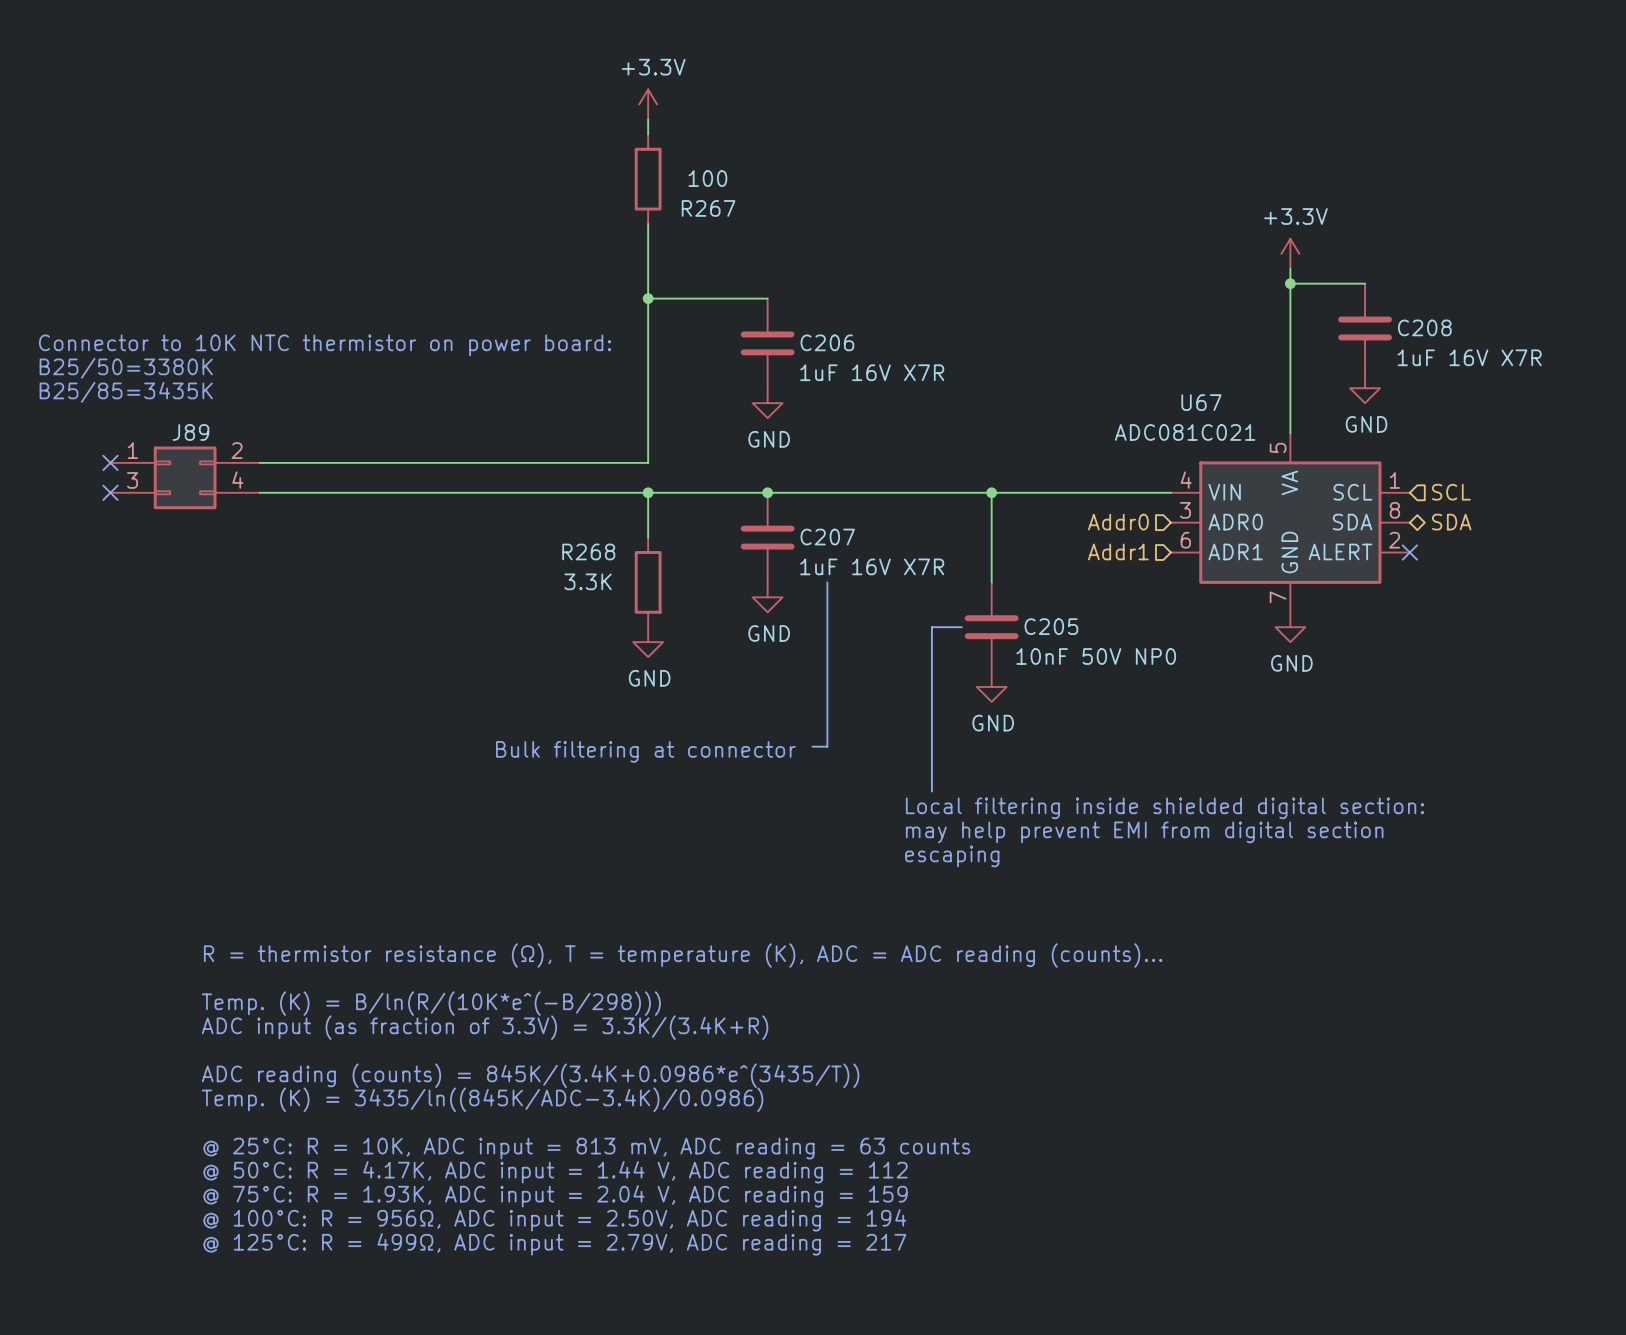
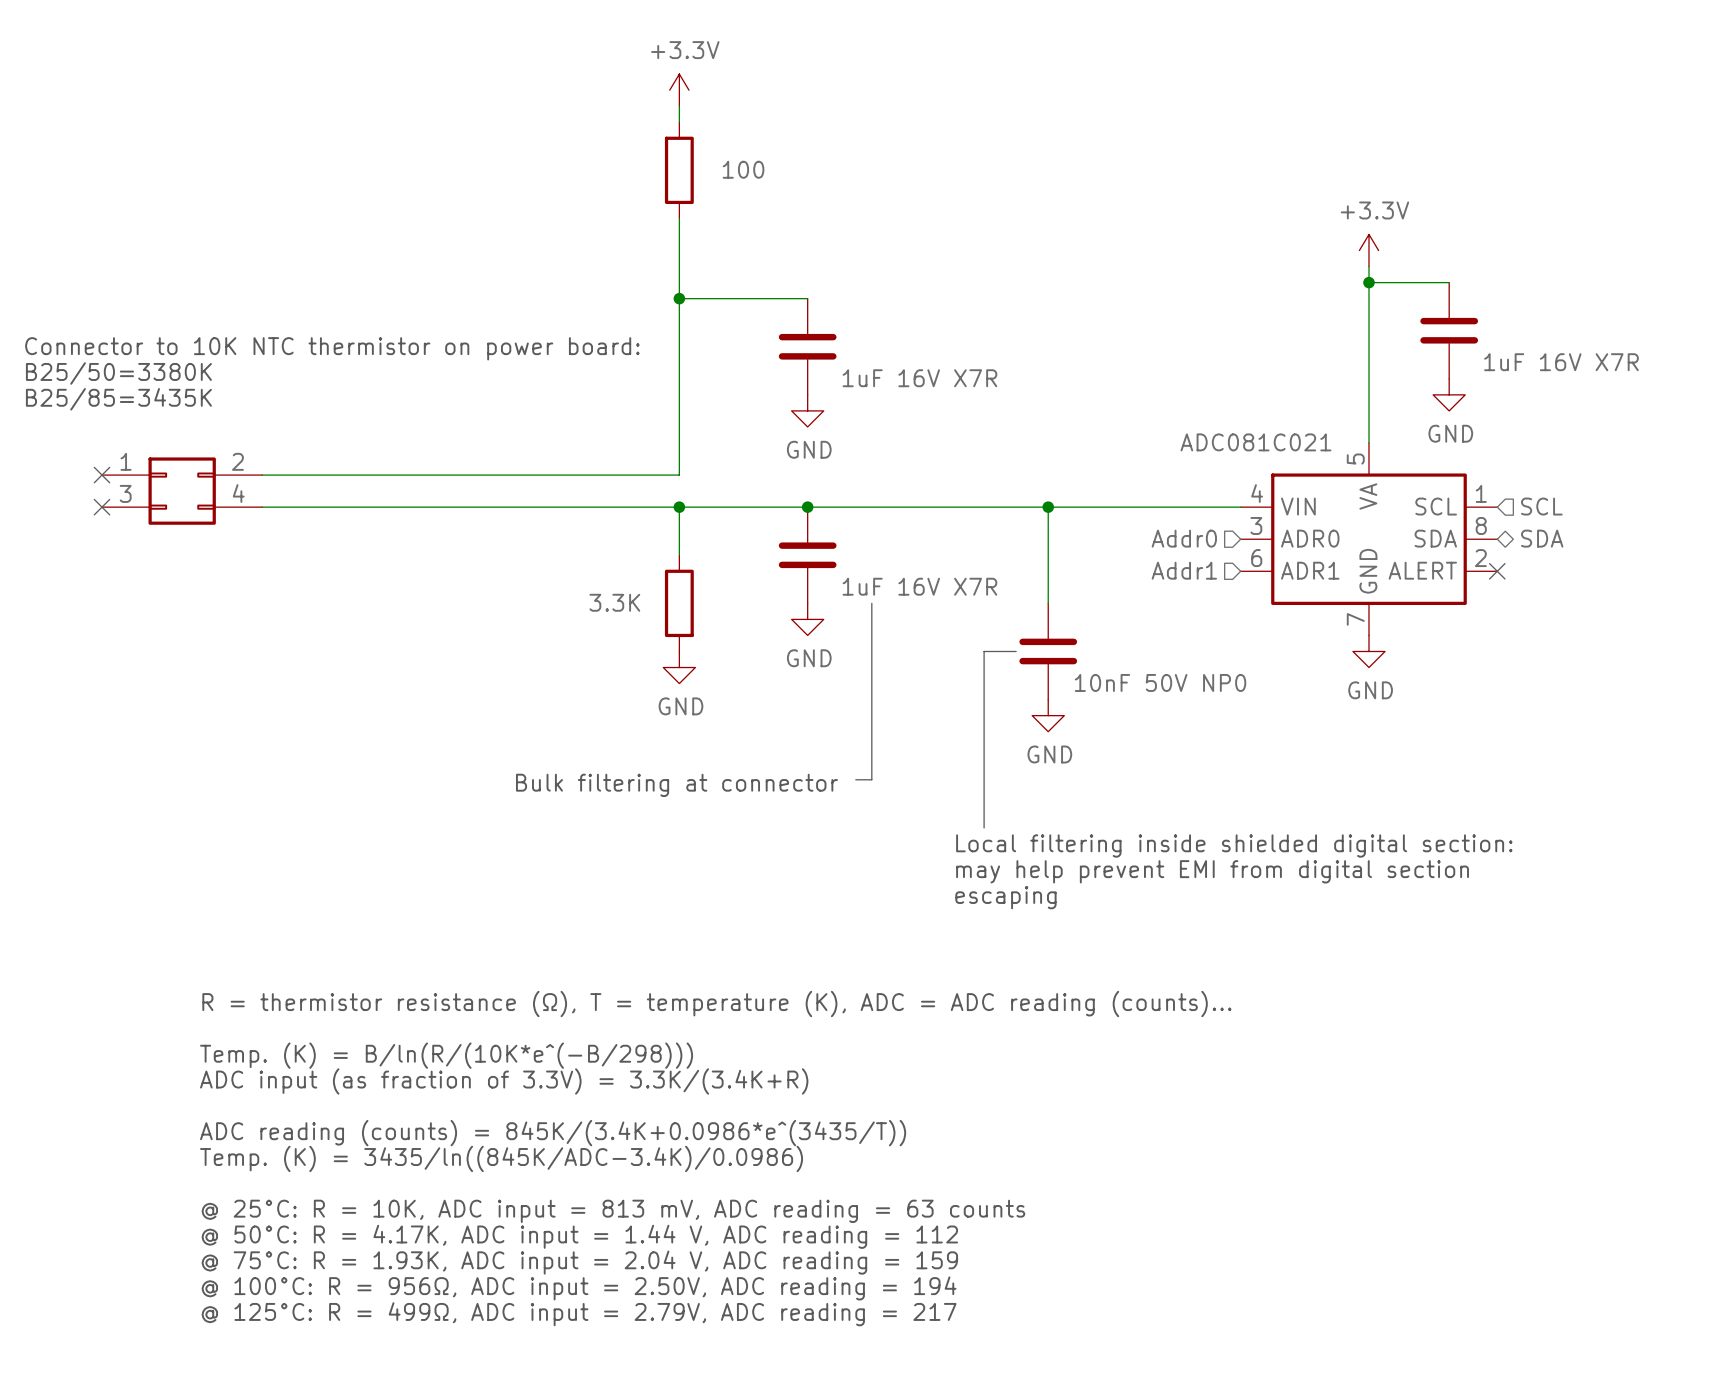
R267 name: R267 (708, 208) -> none
C208 name: C208 (1424, 327) -> none
C206 name: C206 (827, 342) -> none
U67 name: U67 (1201, 402) -> none
J89 name: J89 (190, 432) -> none
C207 name: C207 (827, 537) -> none
R268 name: R268 (588, 551) -> none
C205 name: C205 (1051, 626) -> none

